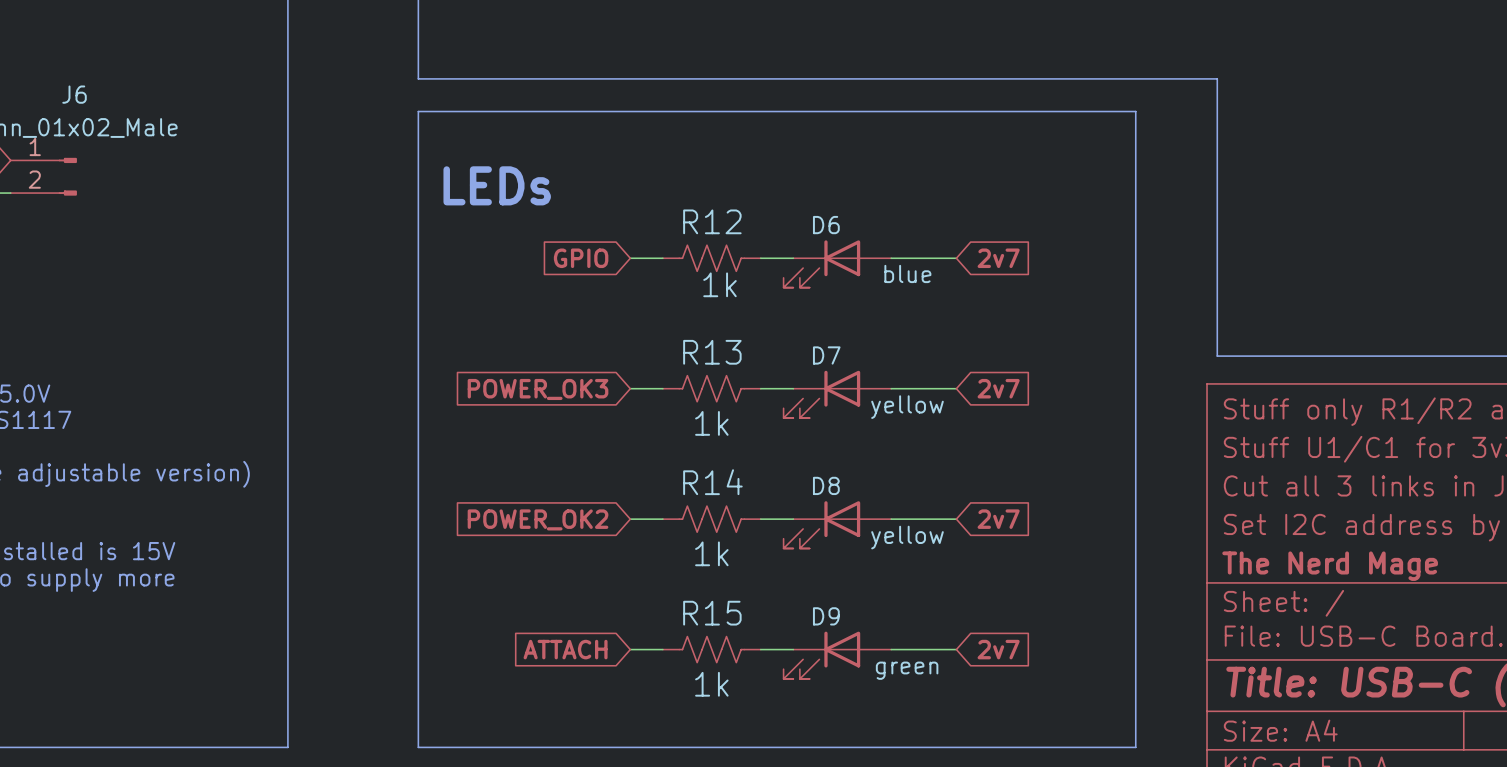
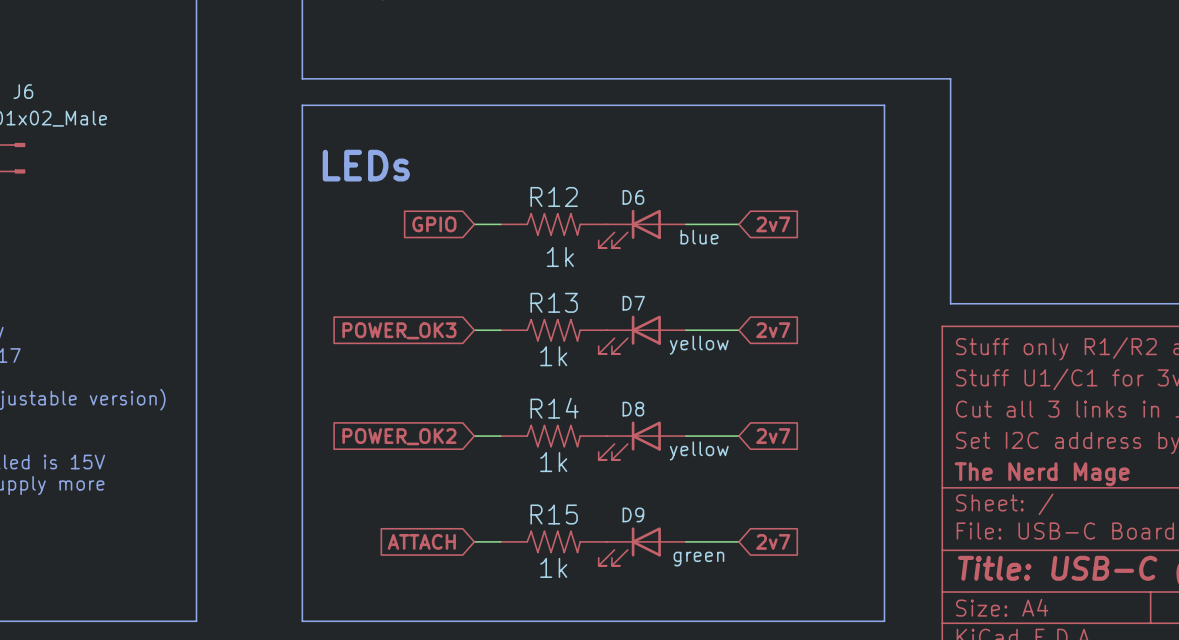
R12 symbol: [662, 245, 761, 272] -> [500, 213, 607, 236]
R13 symbol: [662, 375, 761, 402] -> [500, 318, 607, 342]
R14 symbol: [662, 506, 761, 533] -> [500, 424, 607, 448]
R15 symbol: [662, 636, 761, 663] -> [500, 530, 607, 554]

